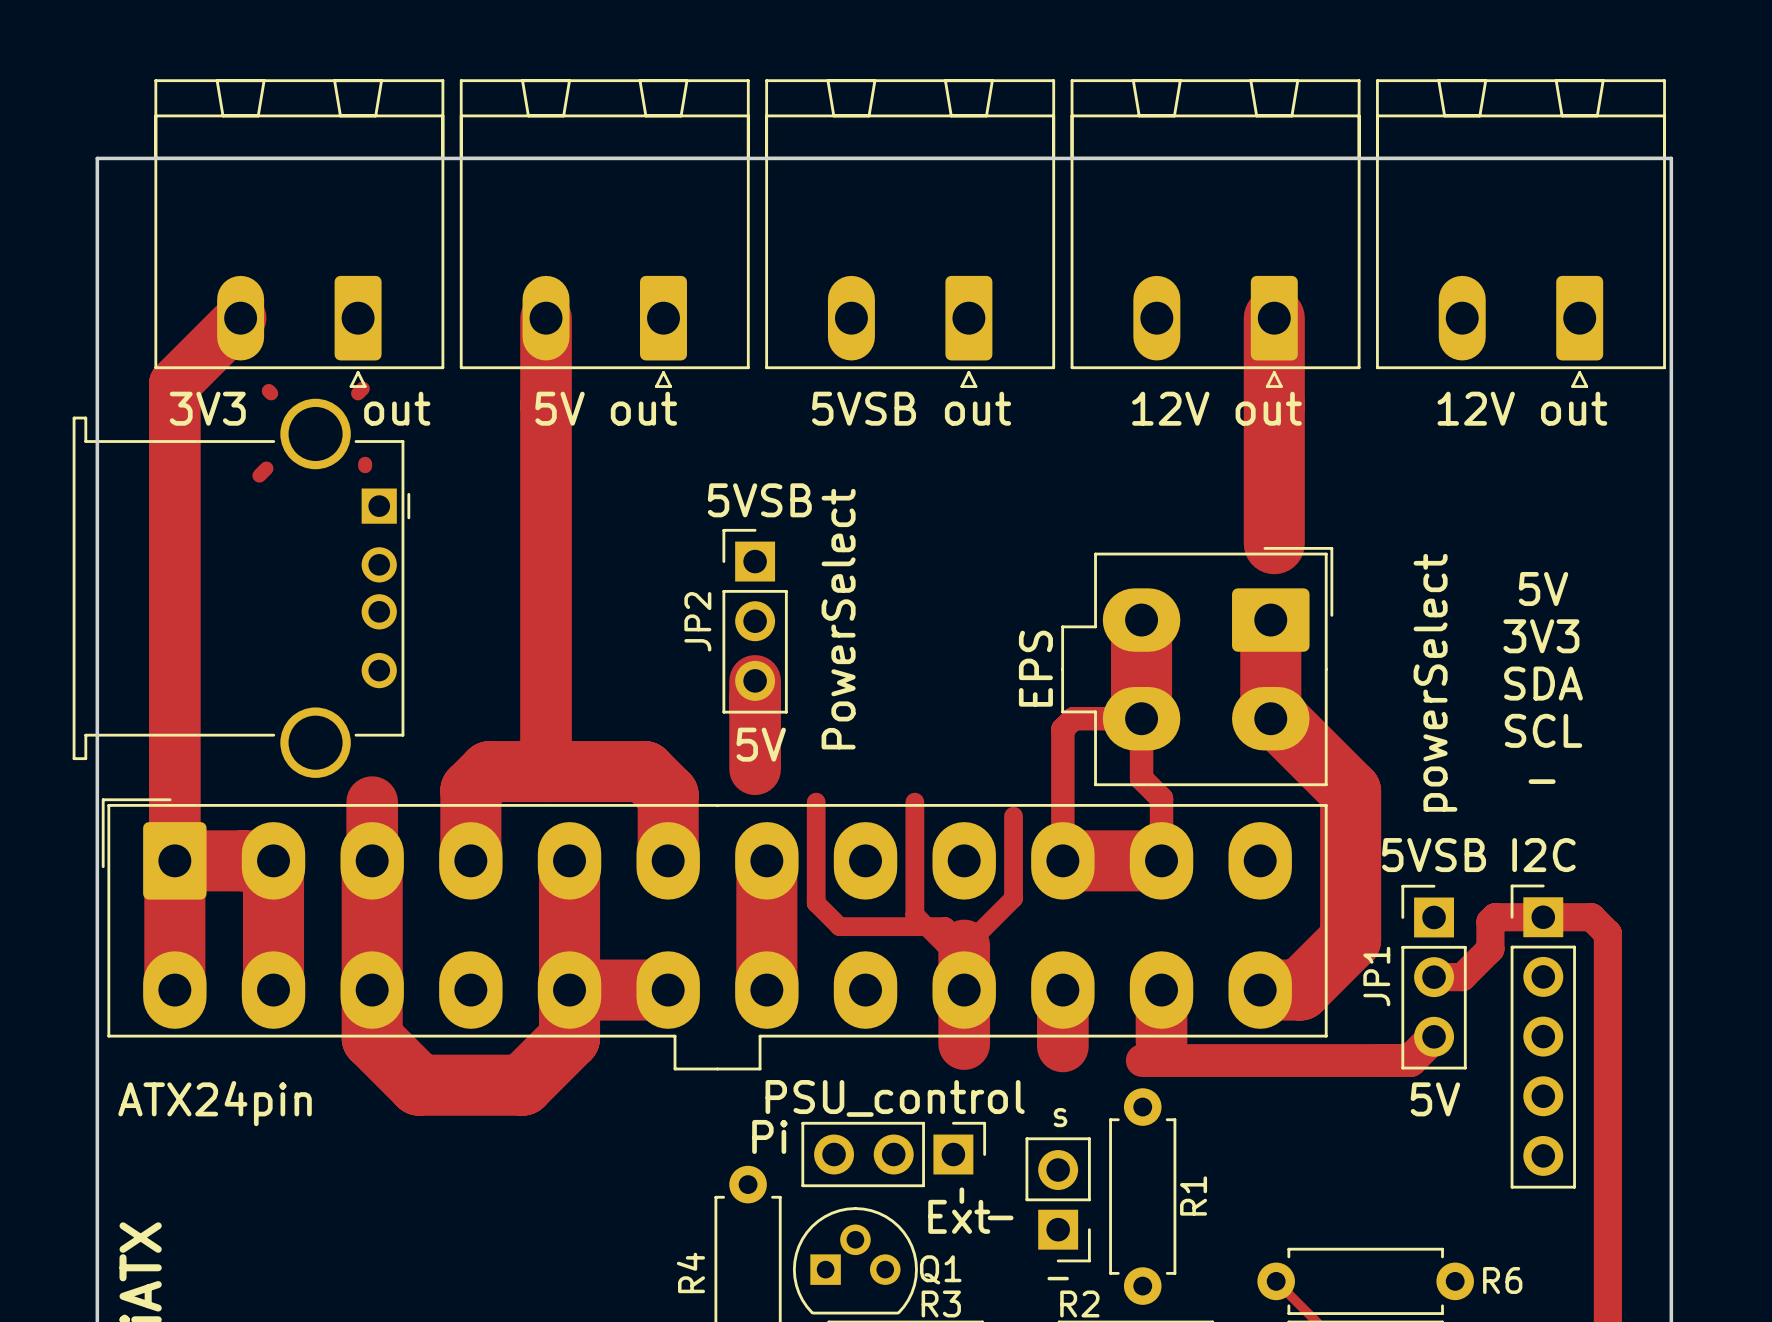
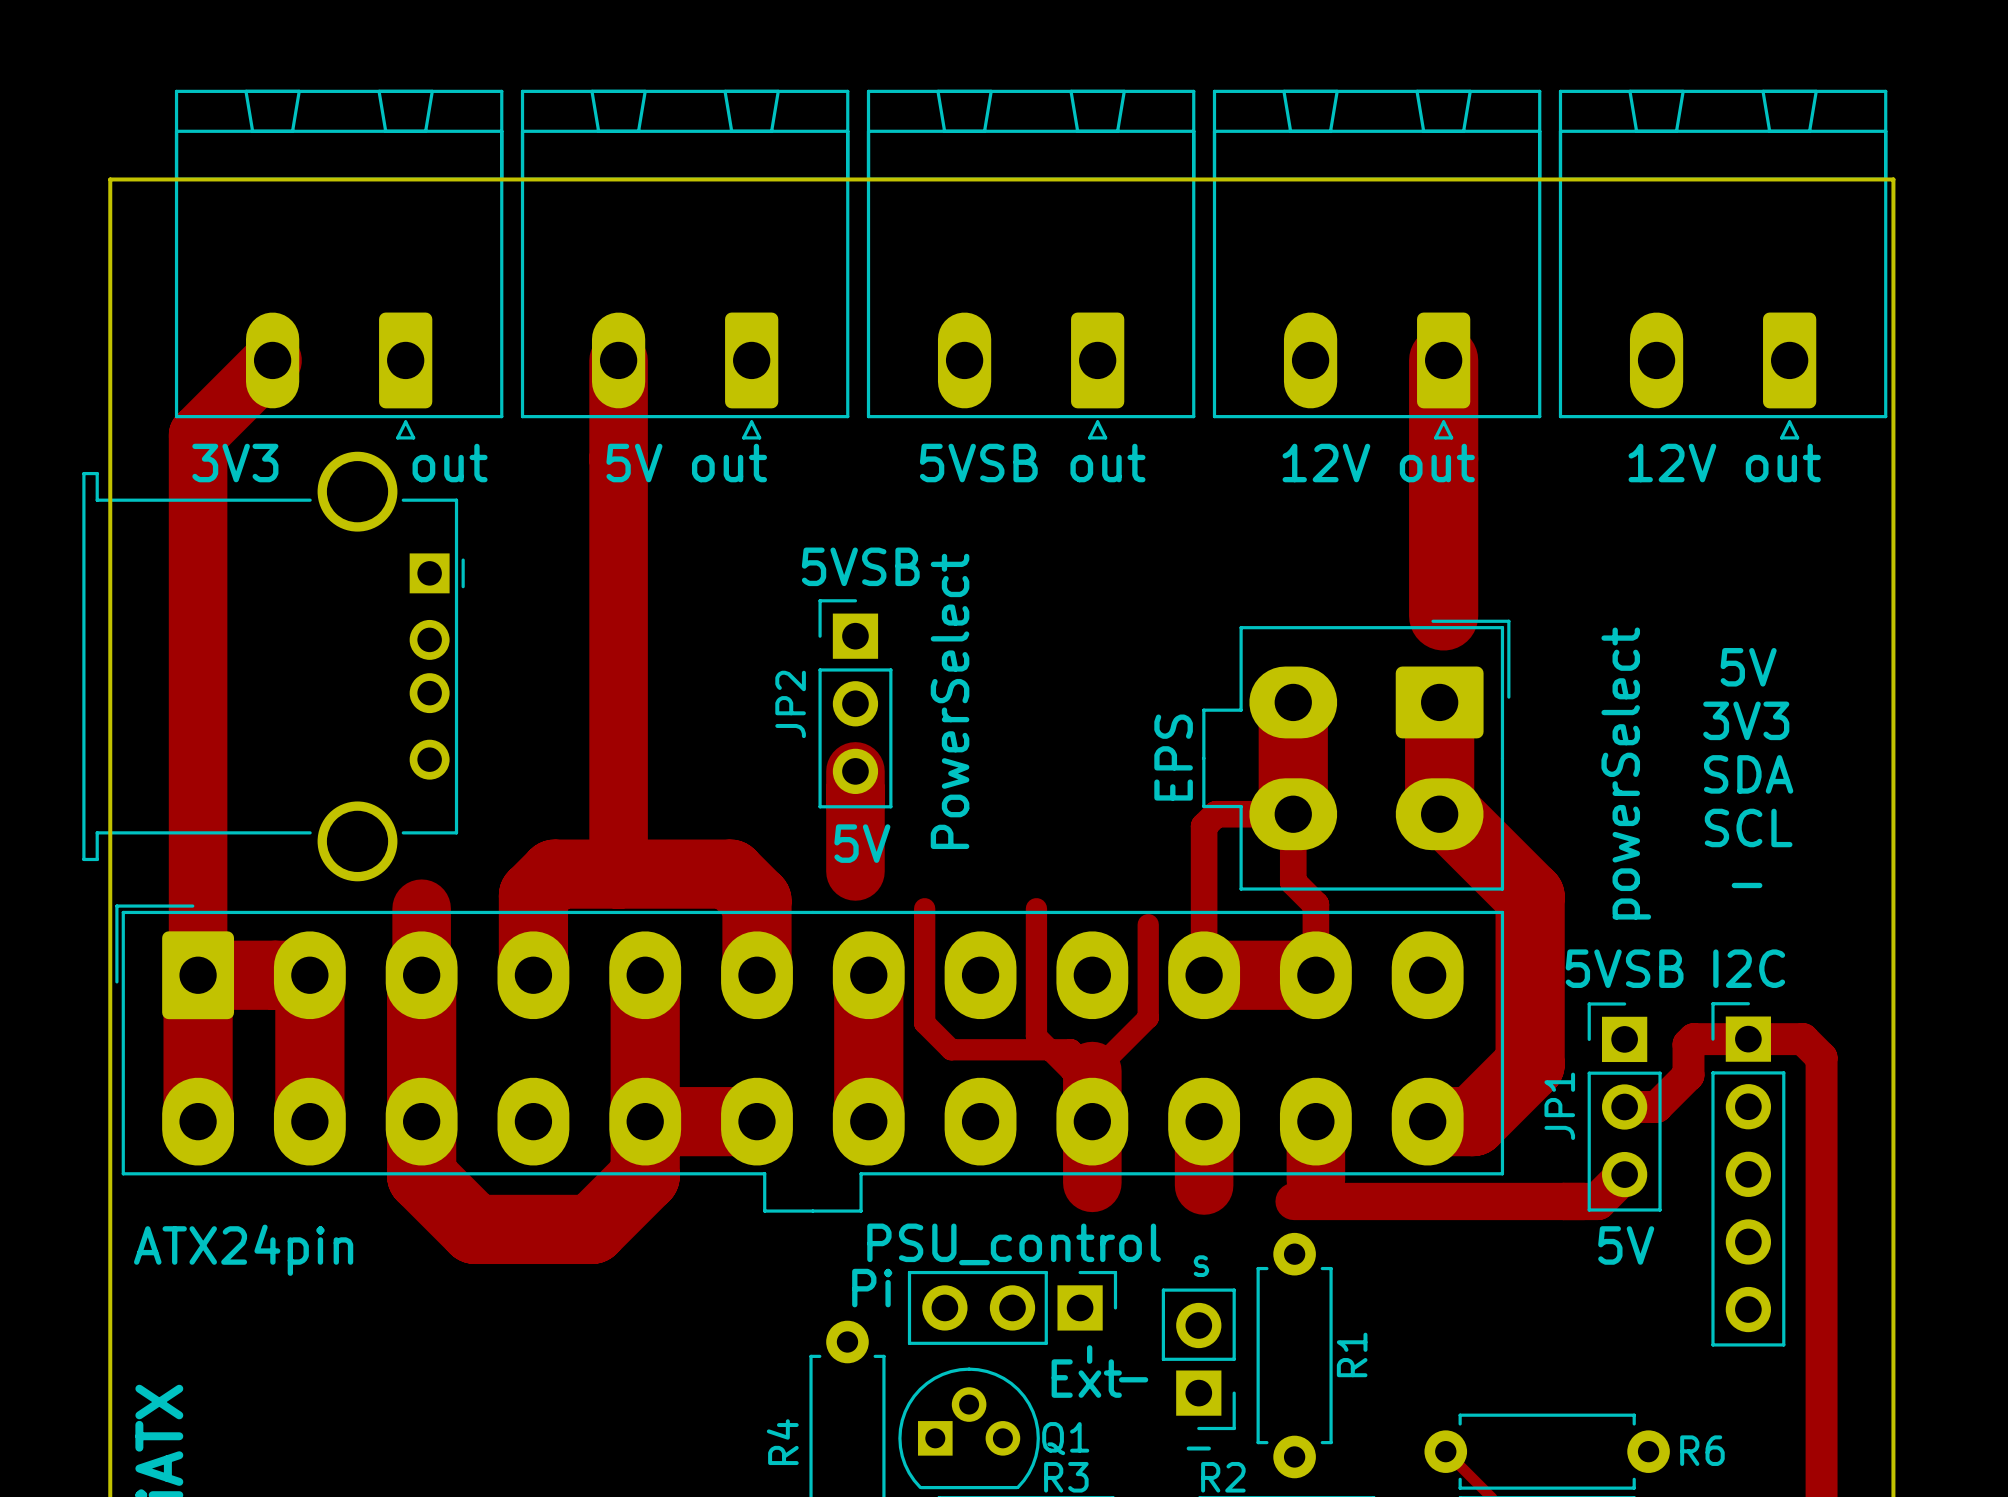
track: (362, 388) (358, 393) -> none
track: (268, 391) (271, 393) -> none
track: (365, 463) (365, 466) -> none
track: (266, 468) (259, 475) -> none

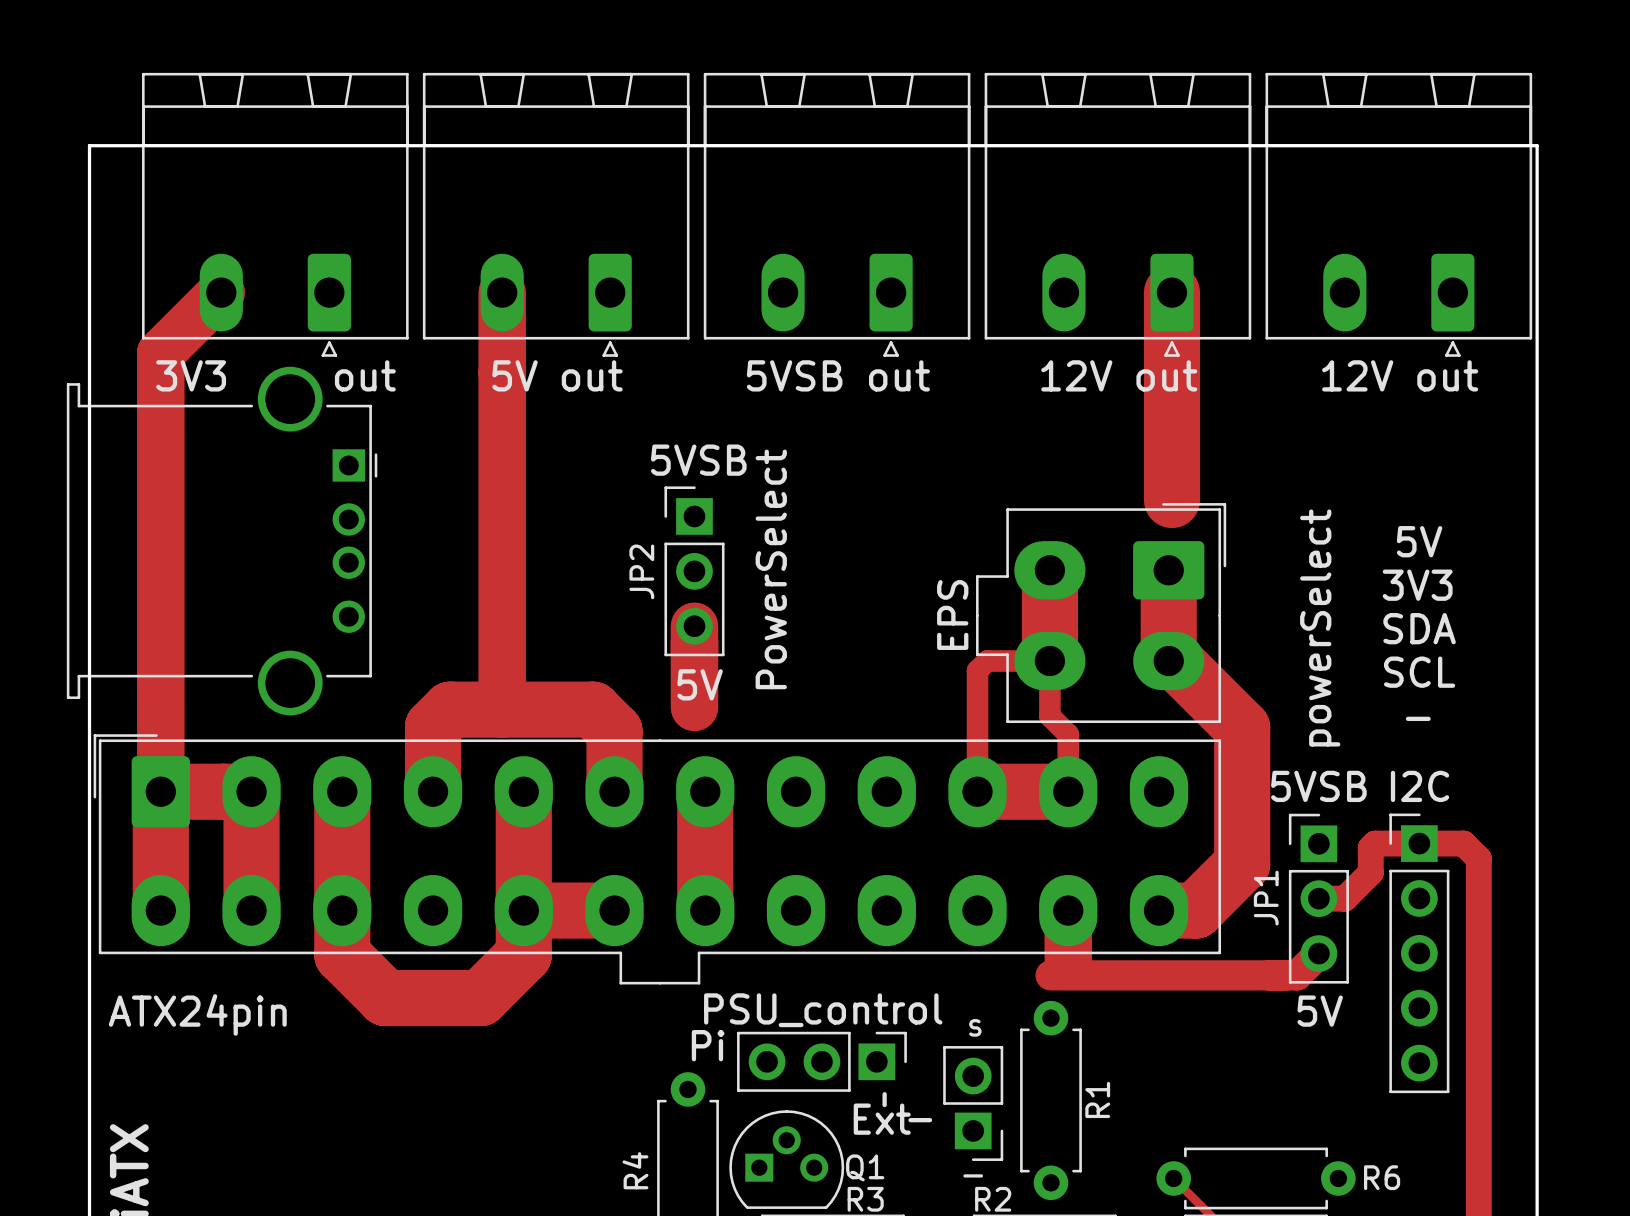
track: (421, 908) (421, 975) -> none
track: (924, 908) (924, 1023) (951, 1049) (1071, 1049) (1092, 1071) (1092, 1182) -> none
track: (1036, 908) (1036, 1036) (1071, 1071) (1094, 1071) (1148, 1017) (1148, 924) -> none
track: (1204, 1121) (1204, 1185) -> none

